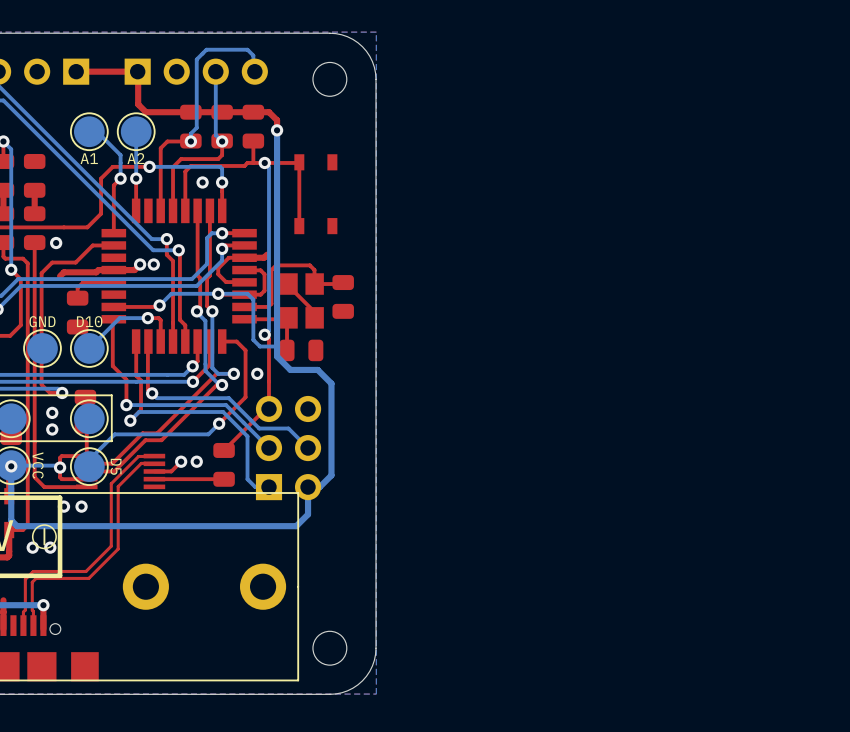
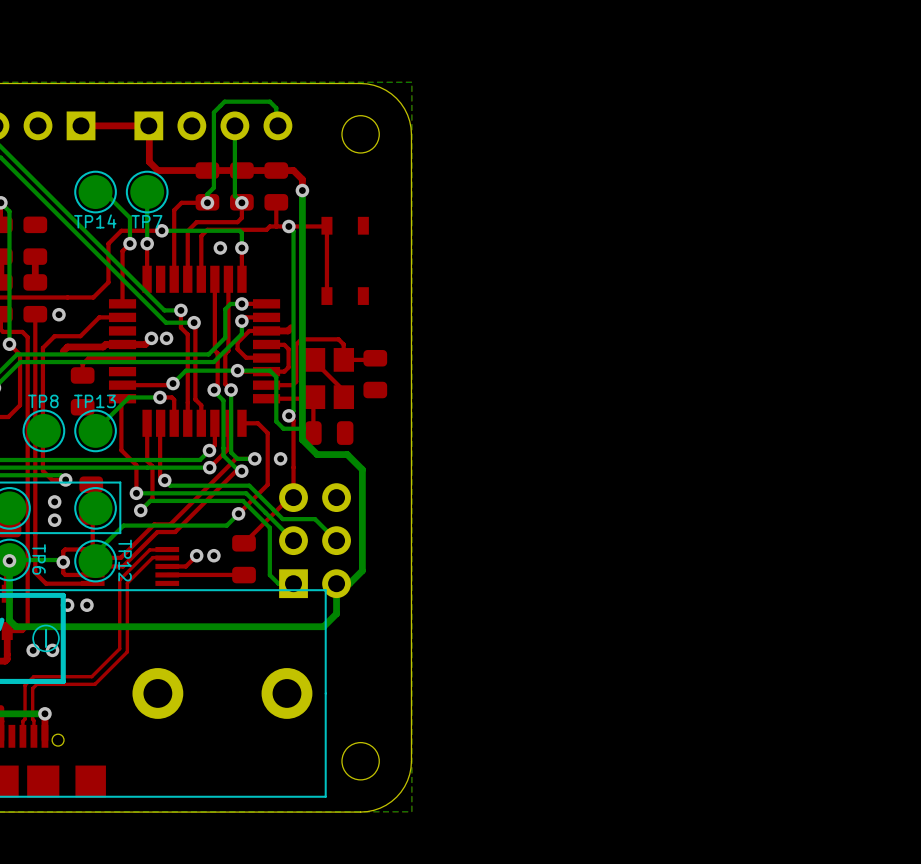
A1 name: A1 (89, 158) -> TP14 (95, 221)
A2 name: A2 (135, 158) -> TP7 (146, 221)
GND name: GND (42, 321) -> TP8 (43, 401)
D10 name: D10 (89, 321) -> TP13 (94, 401)
VCC name: VCC (38, 465) -> TP6 (38, 559)
D5 name: D5 (116, 466) -> TP12 (125, 560)

